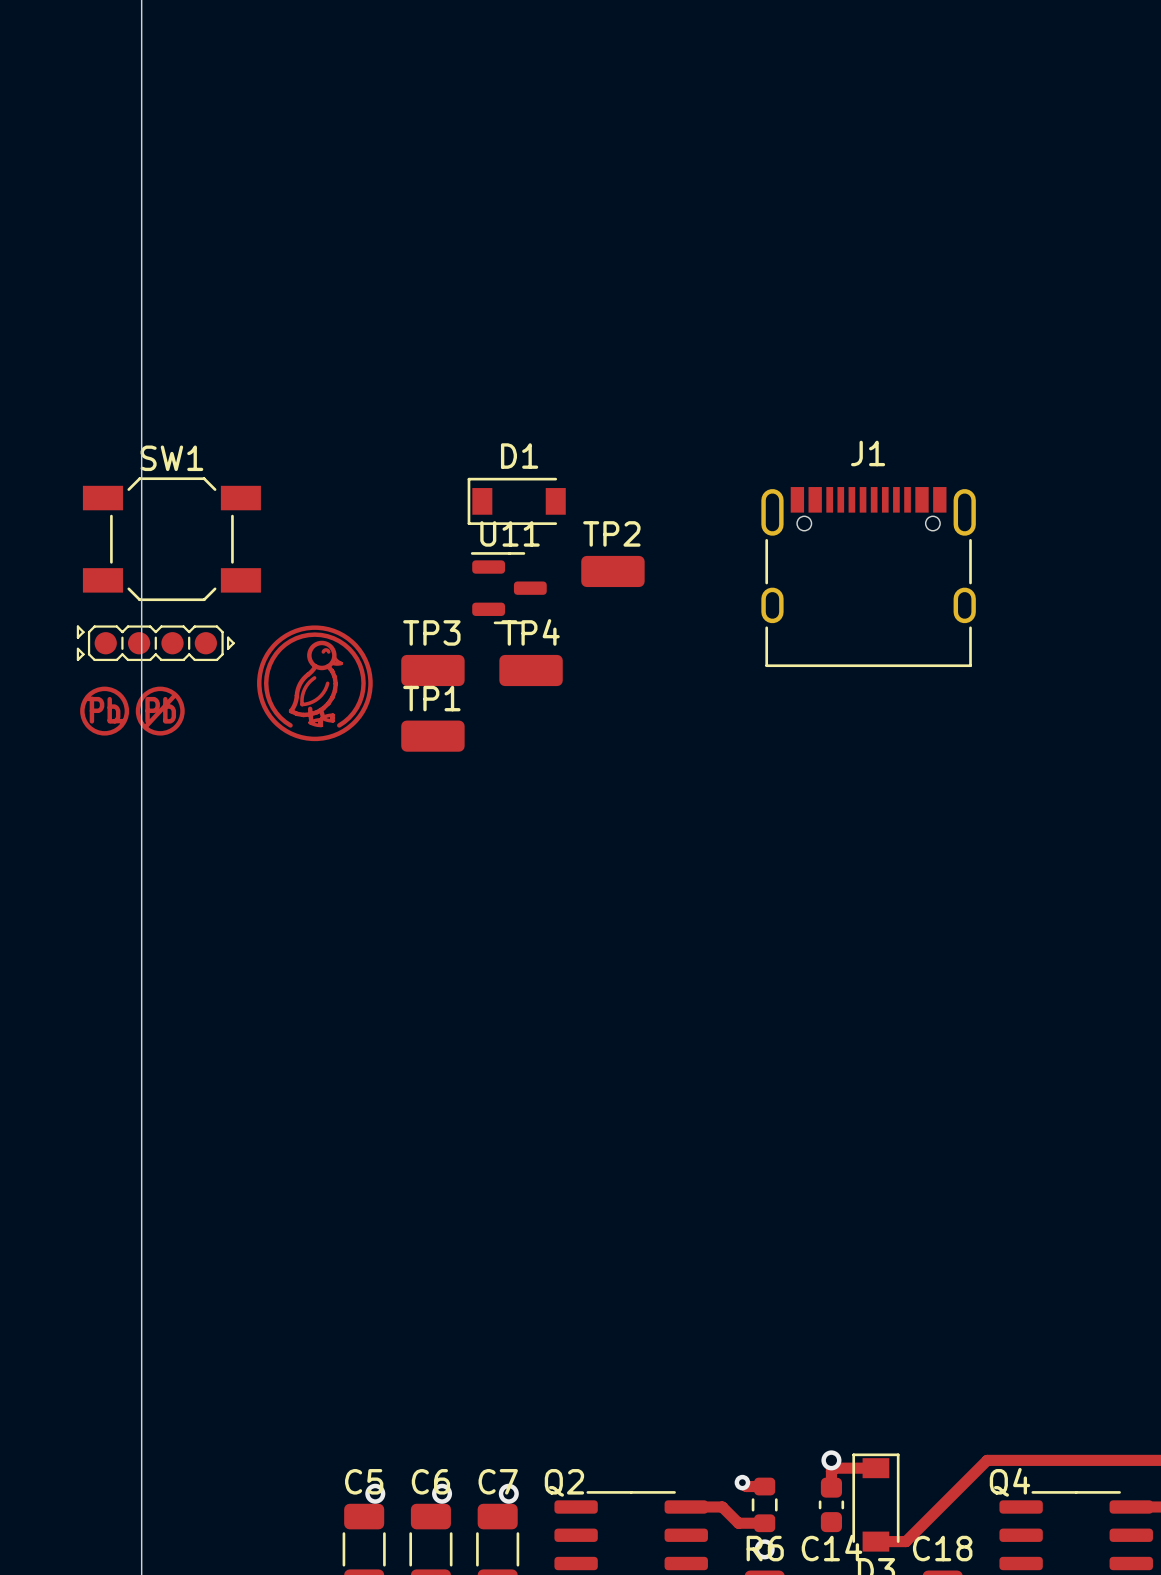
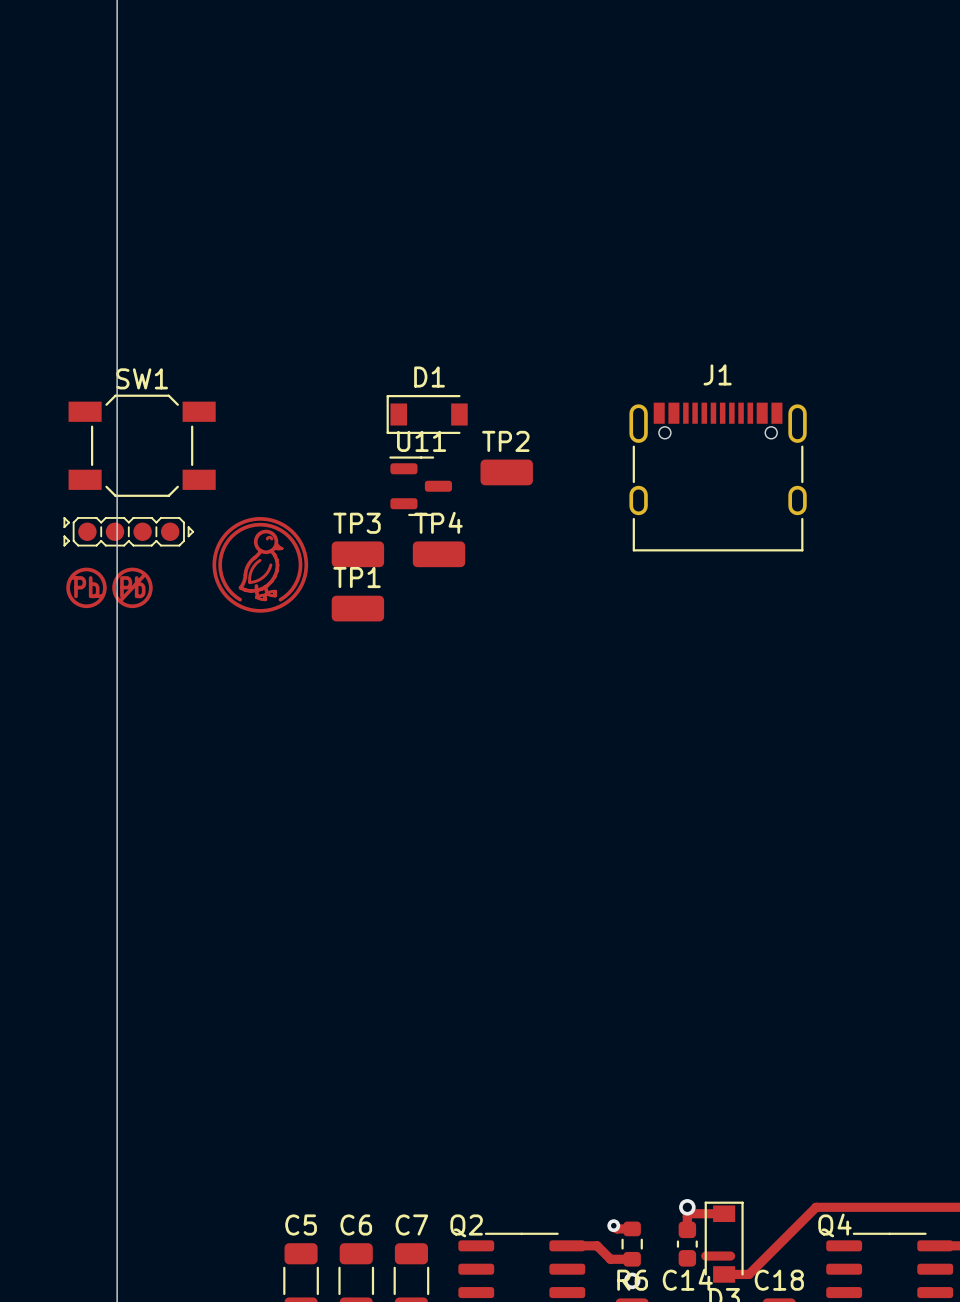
via: (375, 1493) -> none
via: (442, 1493) -> none
via: (508, 1493) -> none
track: none -> (705, 1256) (730, 1256)

